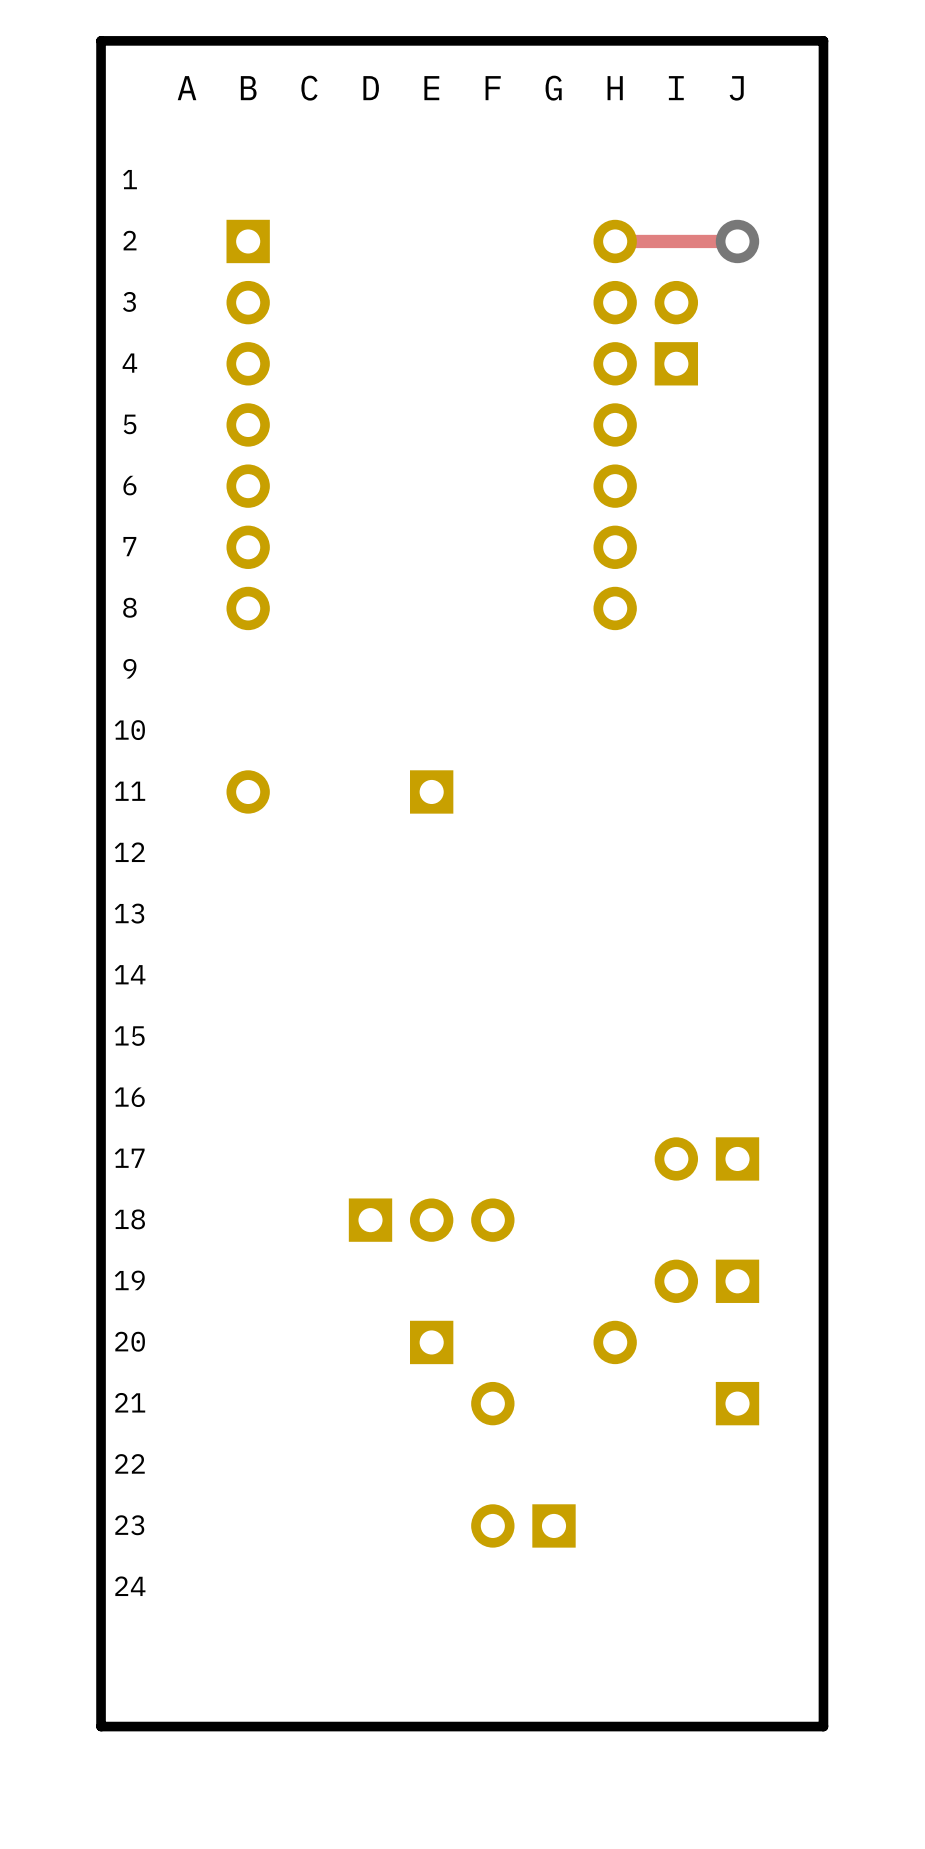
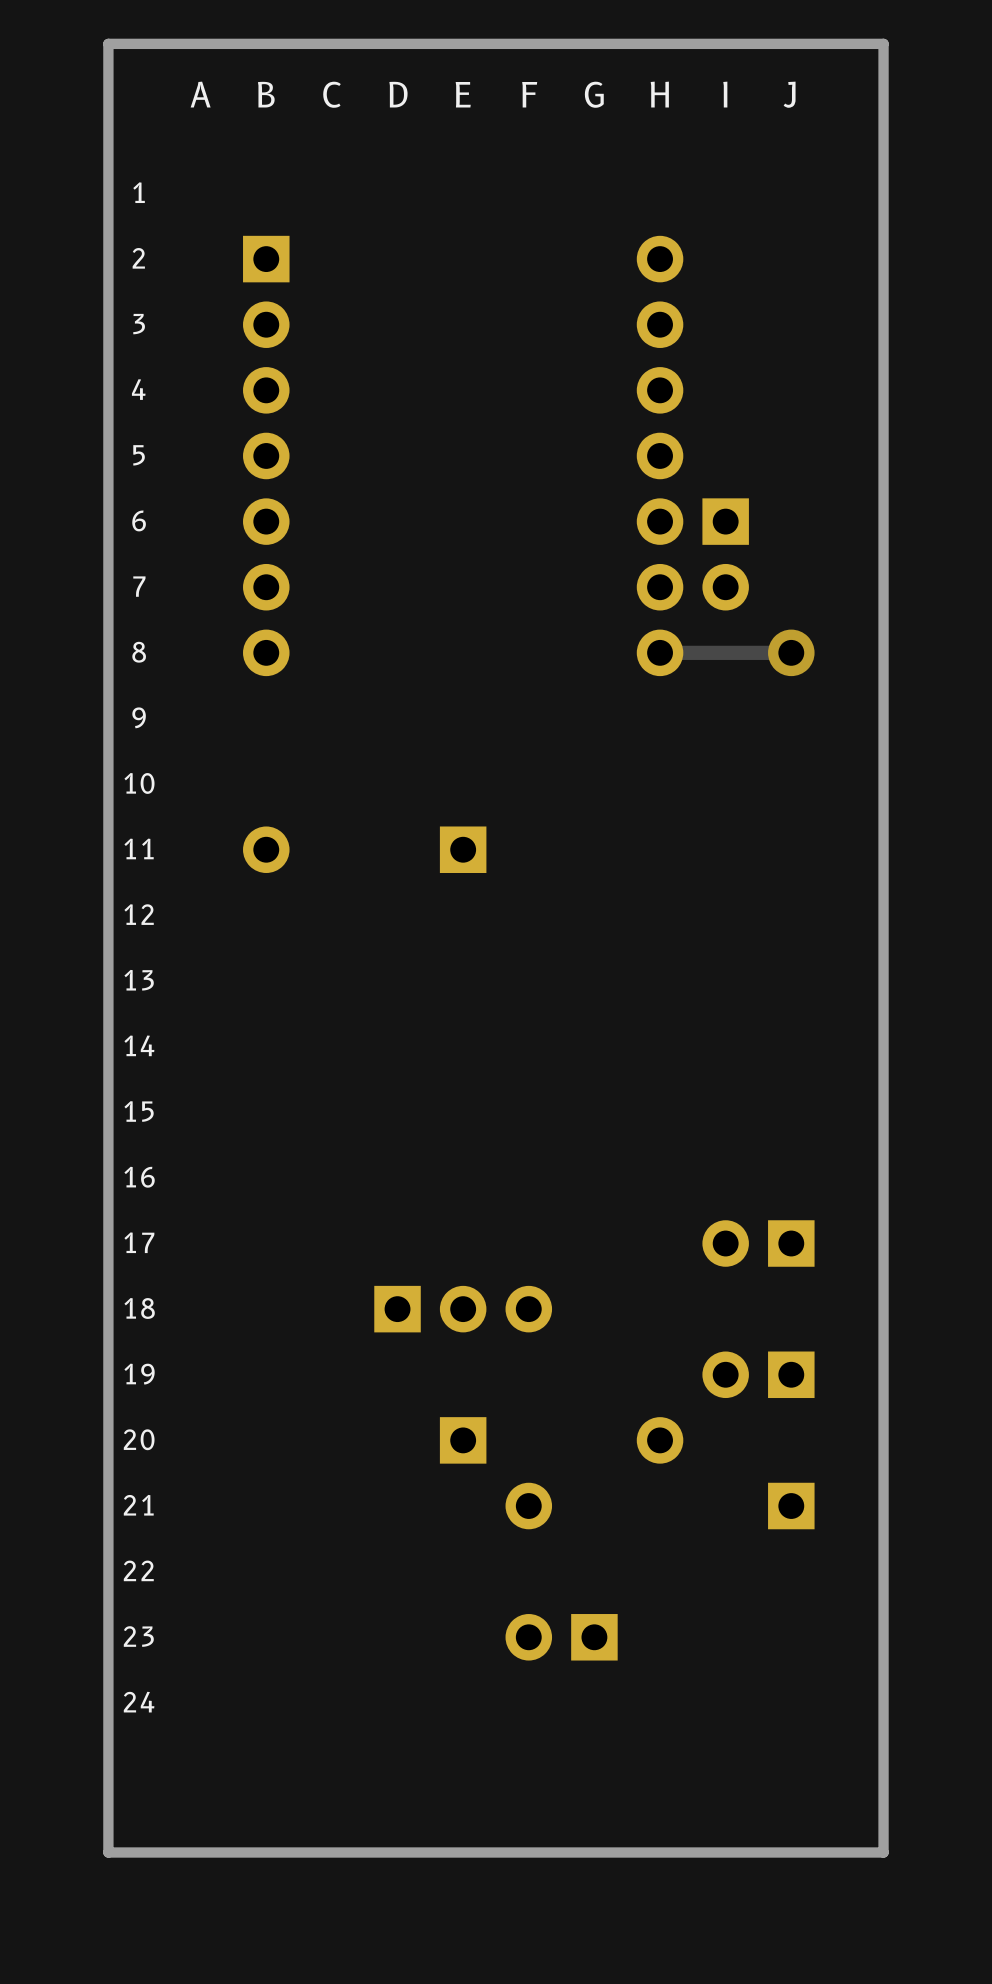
track: (615, 241) (737, 241) -> (660, 652) (791, 652)
via: (737, 241) -> none
part rotation: 0° (676, 333) -> 180° (725, 554)
part position: (676, 333) -> (725, 554)
via: none -> (791, 652)

